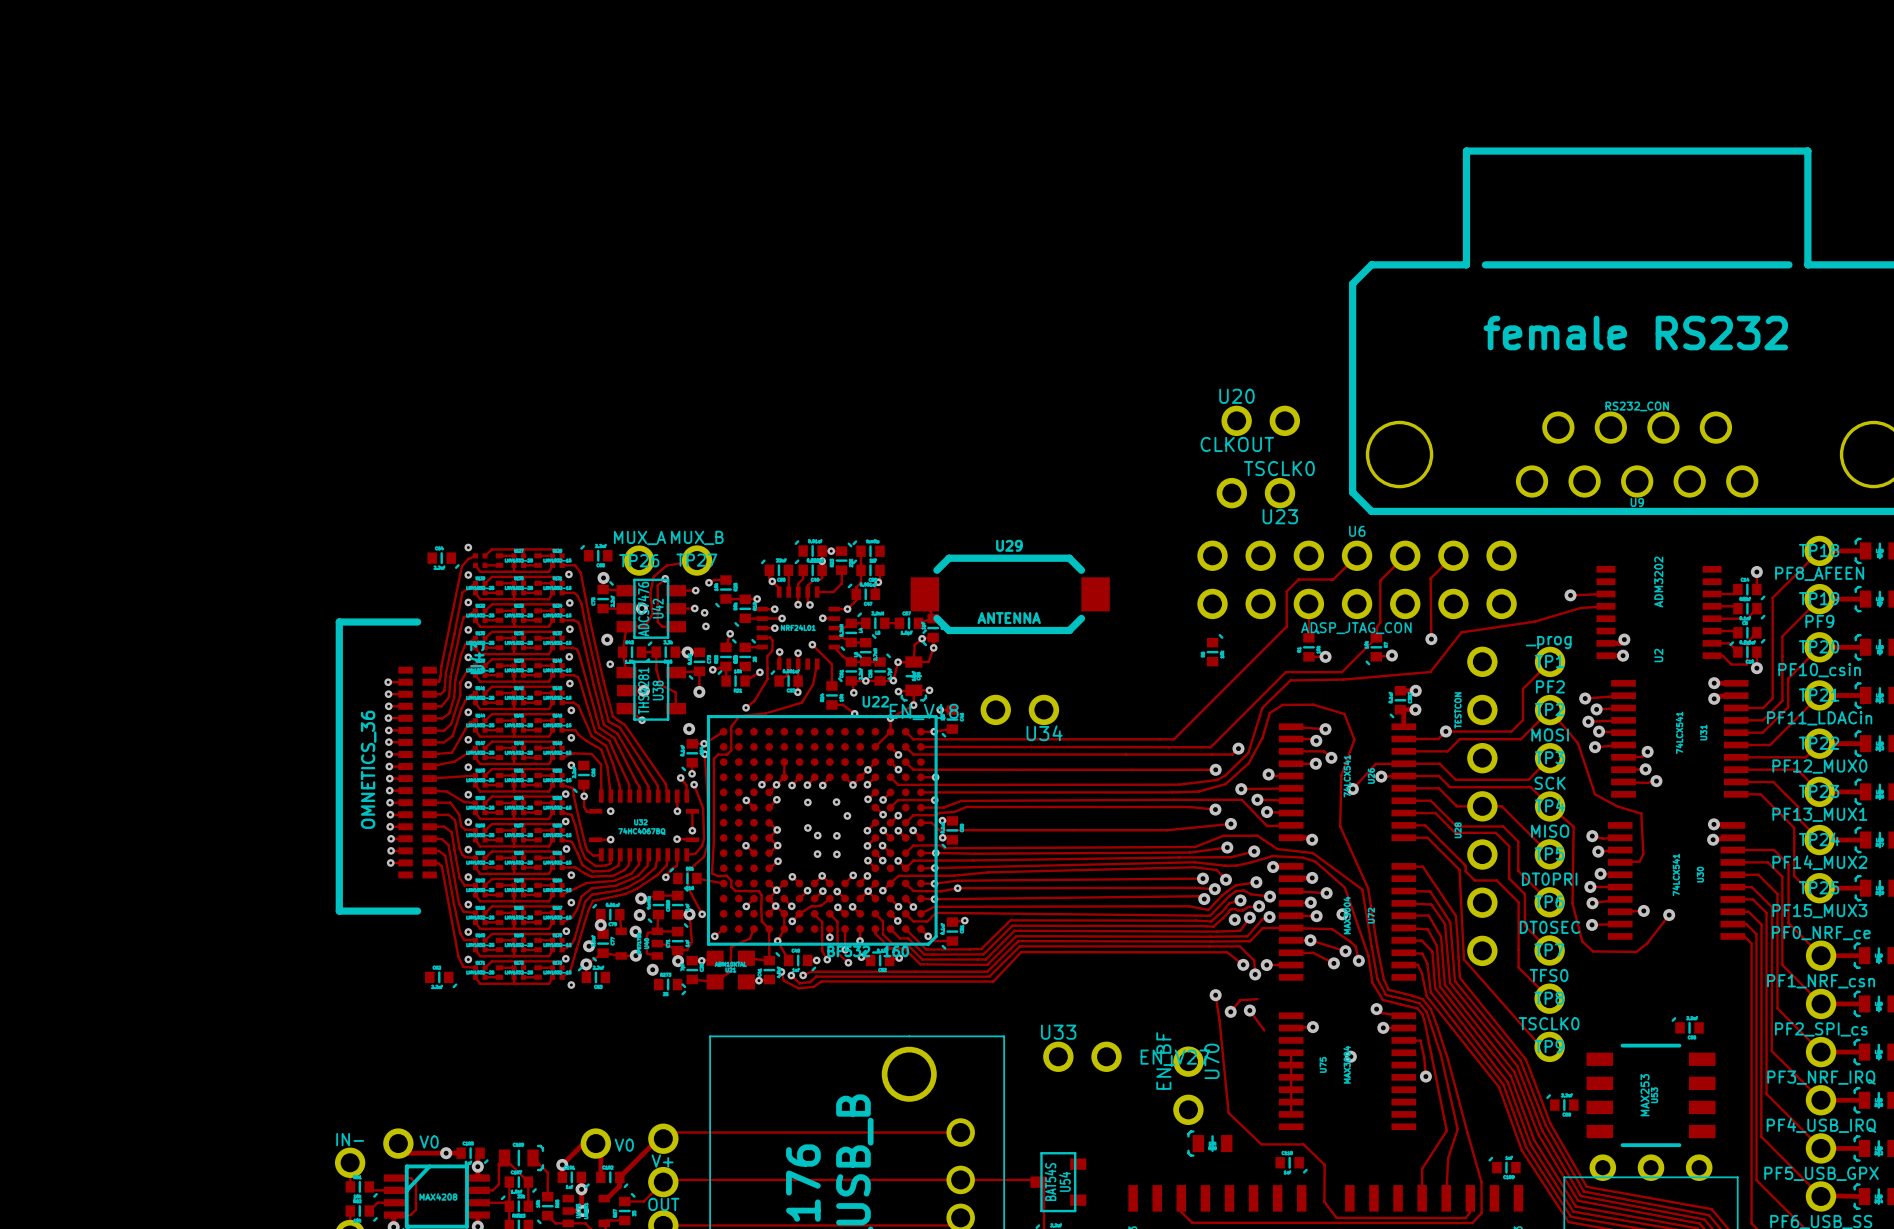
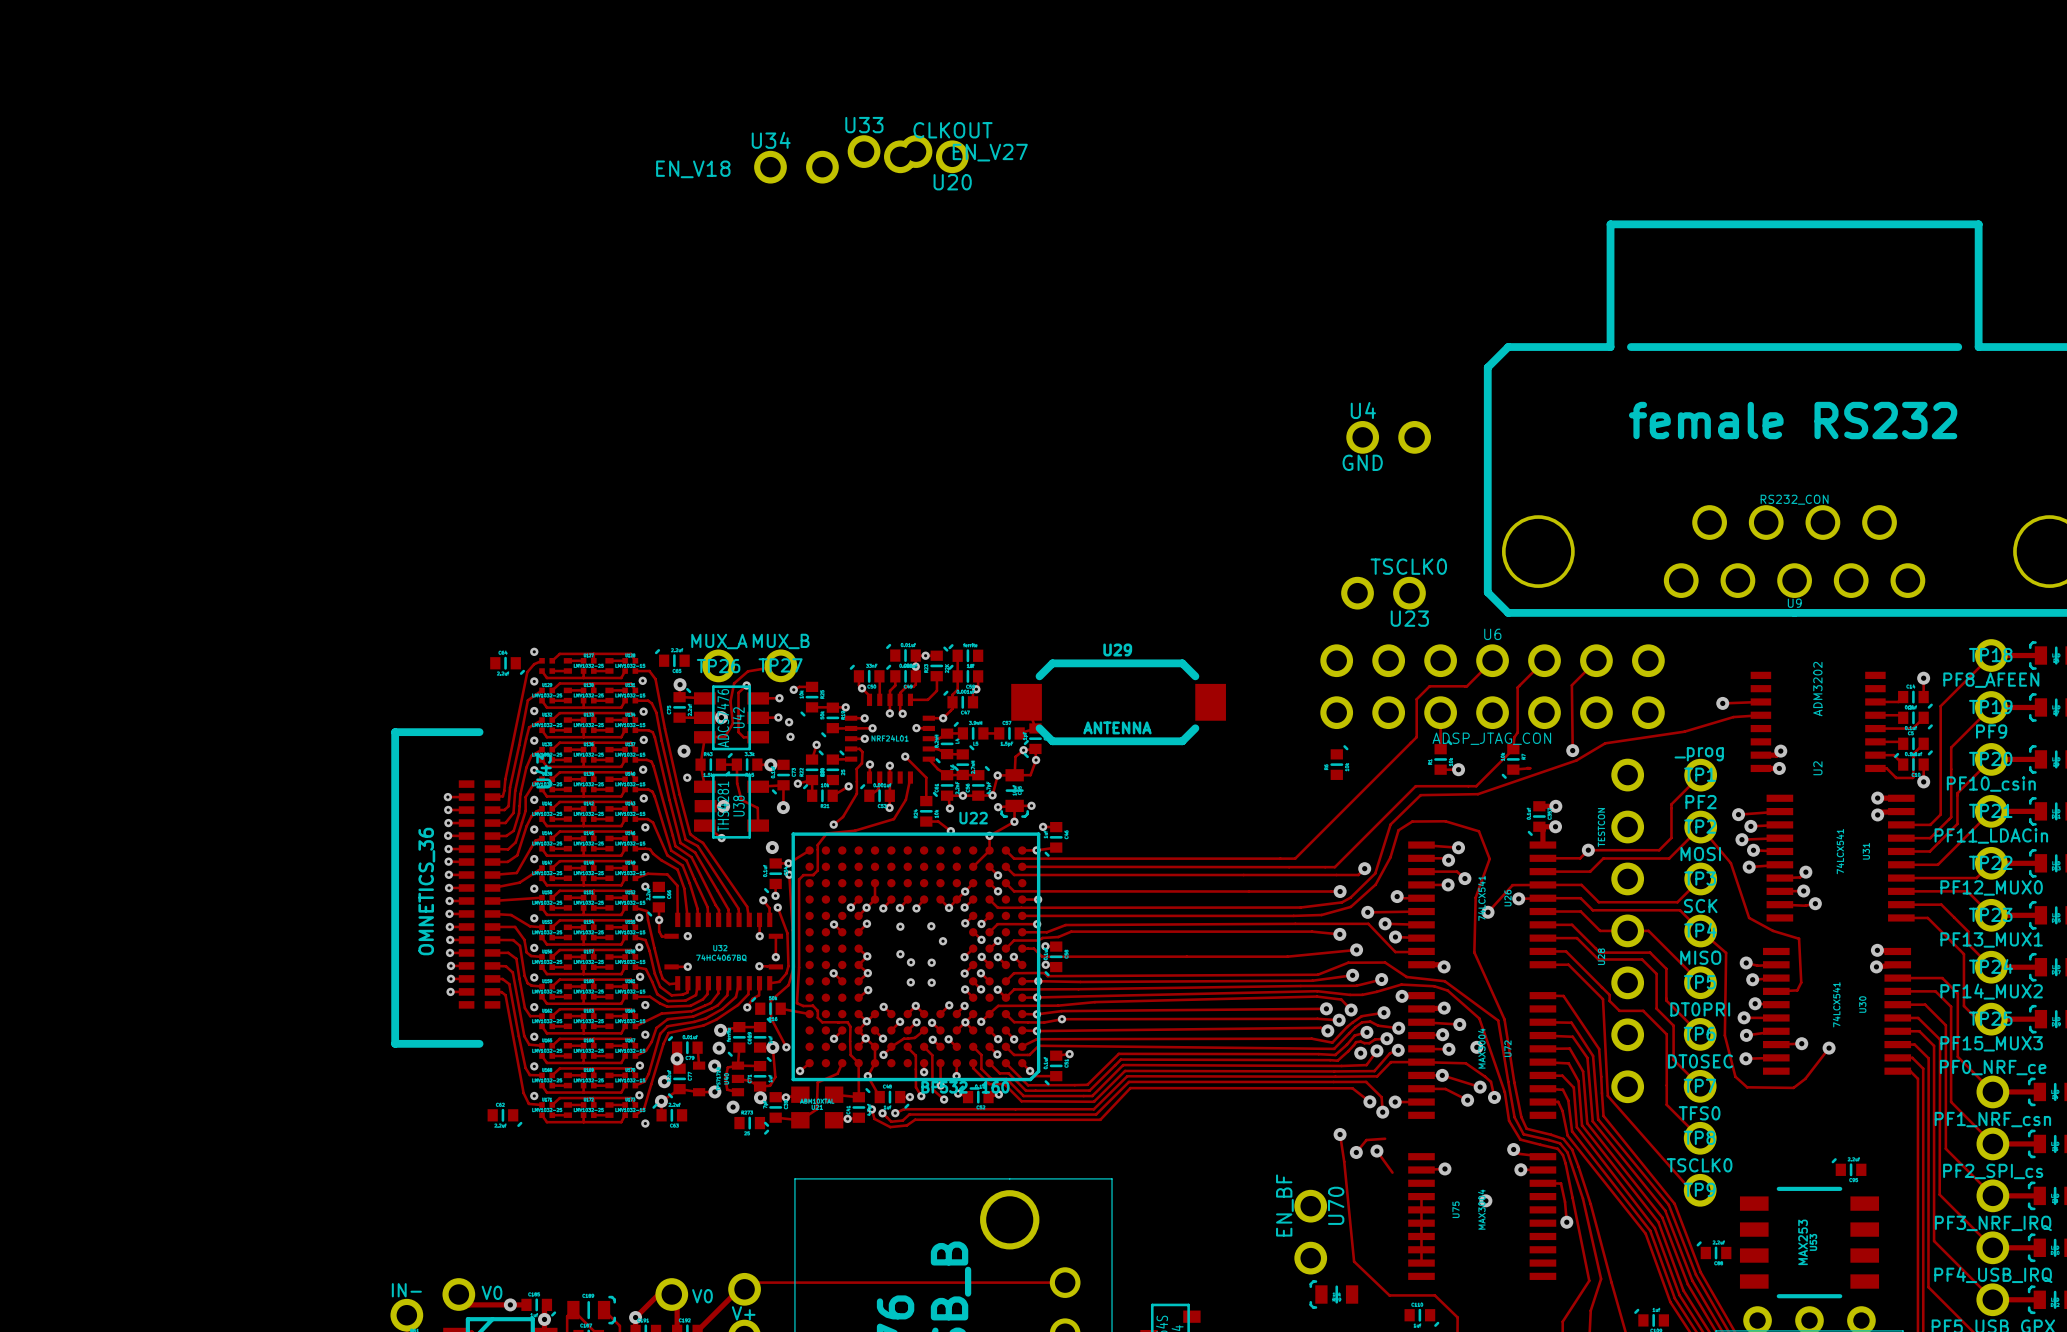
U4: none -> GND (1388, 437)
U20 name position: U20 (1236, 396) -> U20 (952, 182)
U20 position: (1260, 420) -> (926, 156)
U20 value position: CLKOUT (1237, 444) -> CLKOUT (953, 130)
track: (1461, 632) (1430, 672) (1343, 679) -> (1605, 743) (1576, 760) (1478, 794)
via: (1391, 655) -> none
U34 position: (1019, 709) -> (796, 167)
U34 name position: U34 (1044, 733) -> U34 (771, 140)
U33 position: (1082, 1056) -> (890, 151)

